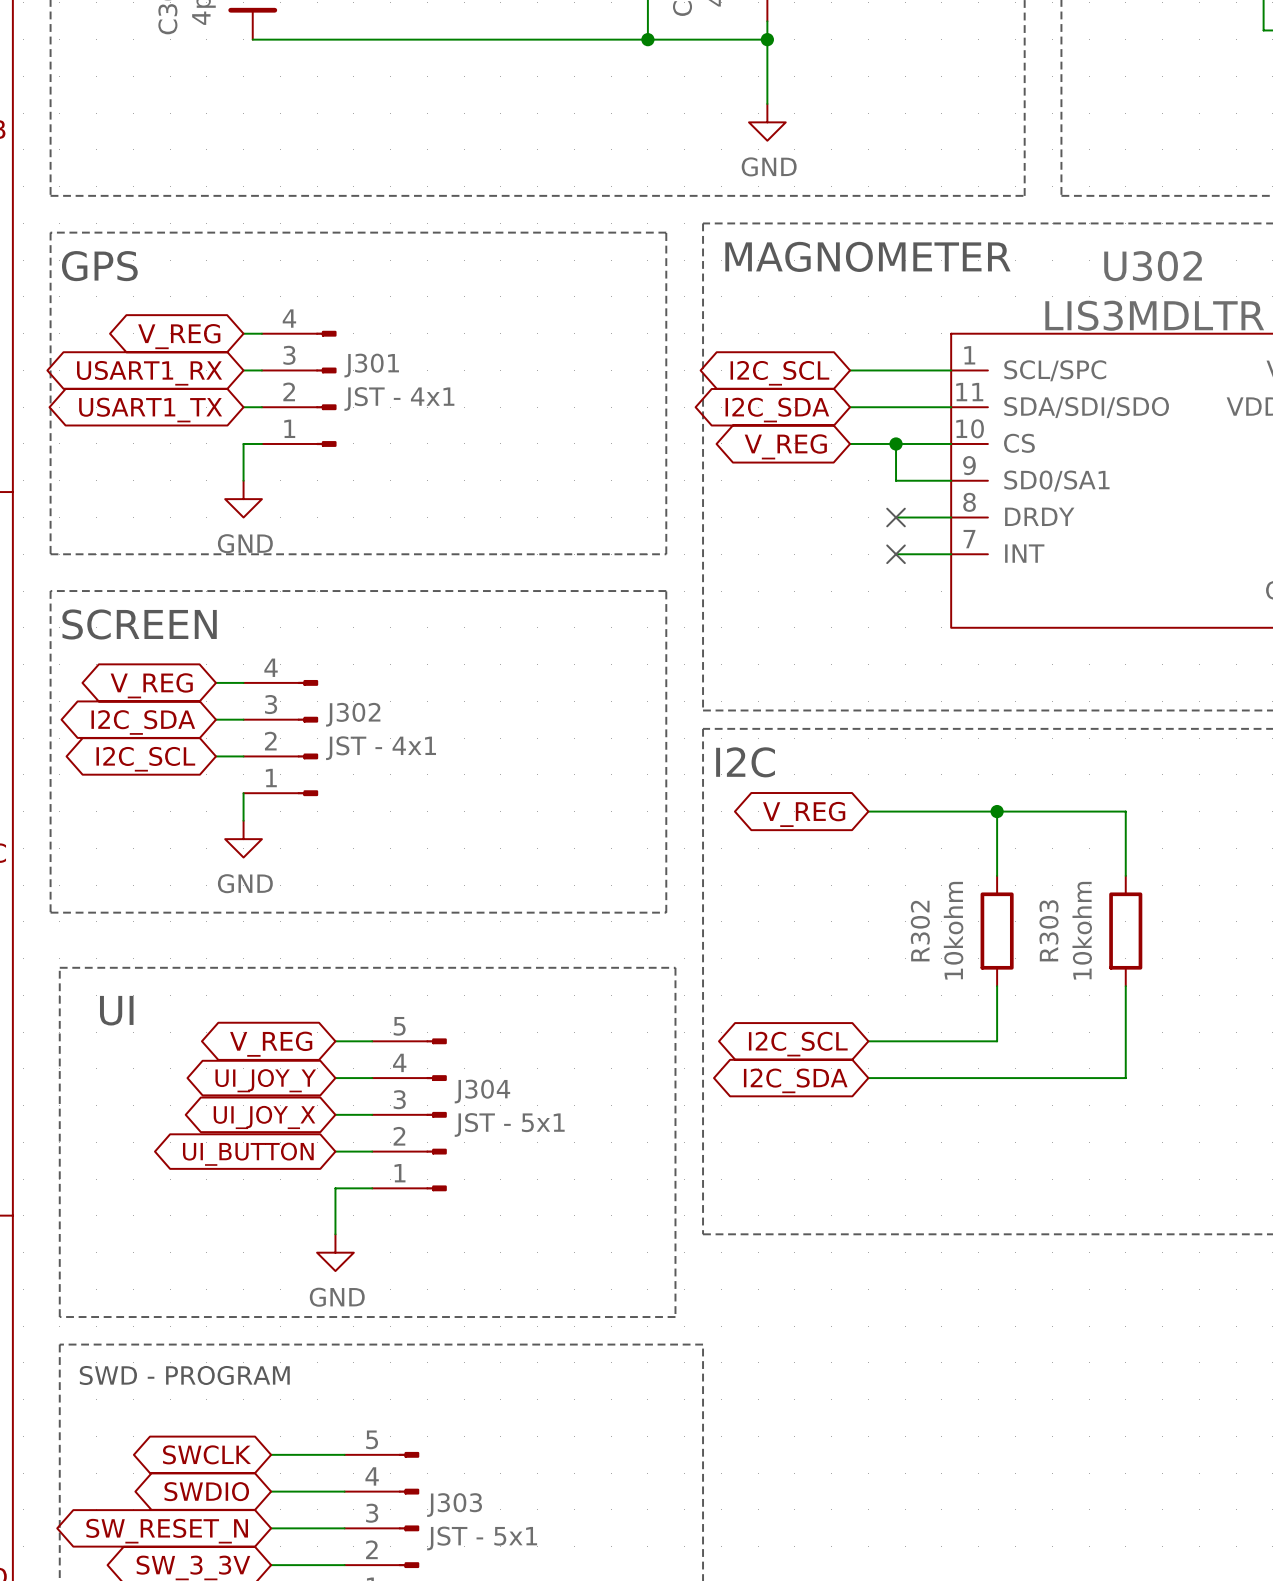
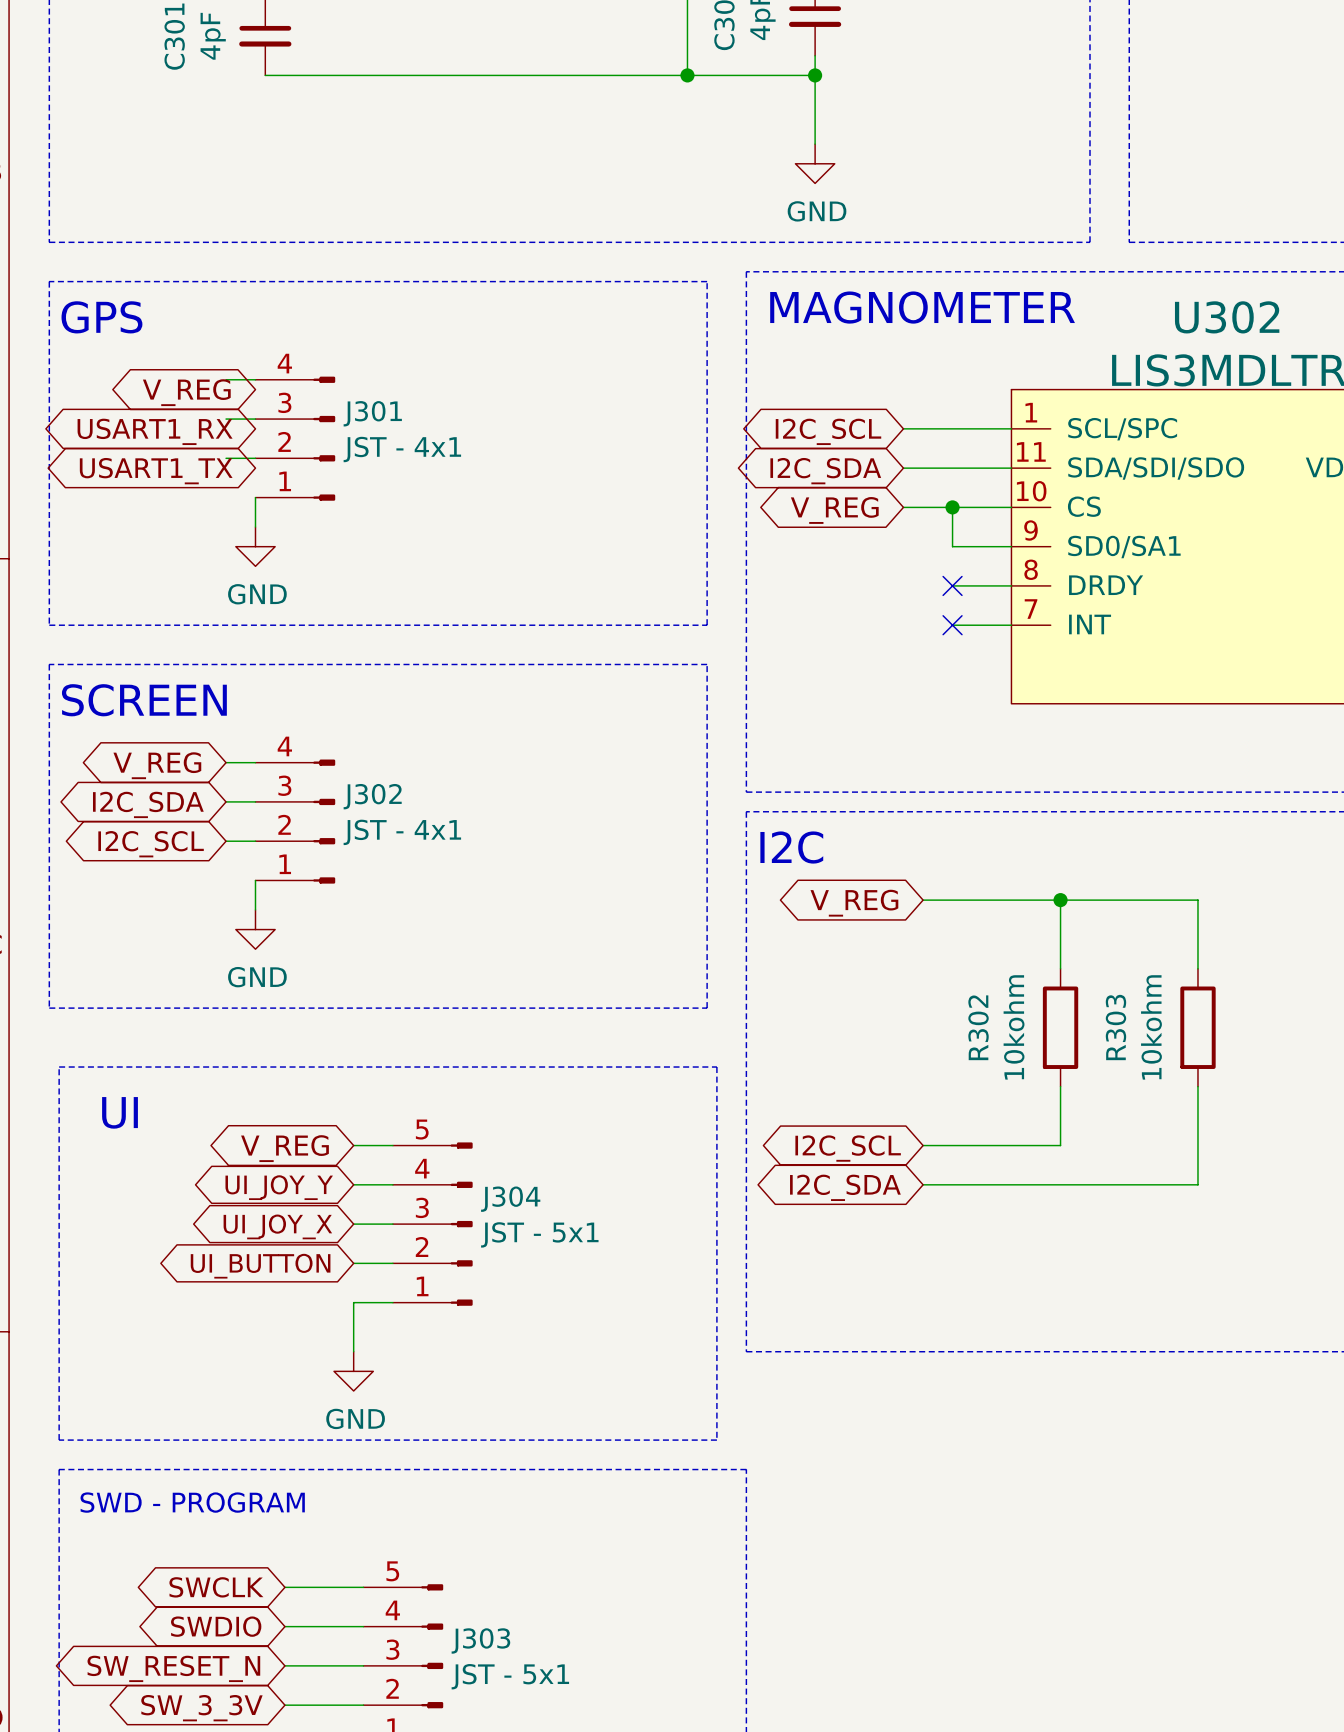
wire: none -> (226, 379) (255, 379)
wire: (243, 333) (261, 333) -> none
wire: none -> (226, 419) (255, 419)
wire: (243, 370) (261, 370) -> none
J301 position: (299, 388) -> (295, 438)
wire: none -> (226, 458) (255, 458)
wire: (243, 407) (261, 407) -> none
wire: (243, 443) (261, 443) -> (255, 507) (255, 497)
power symbol position: GND (243, 499) -> GND (255, 546)

